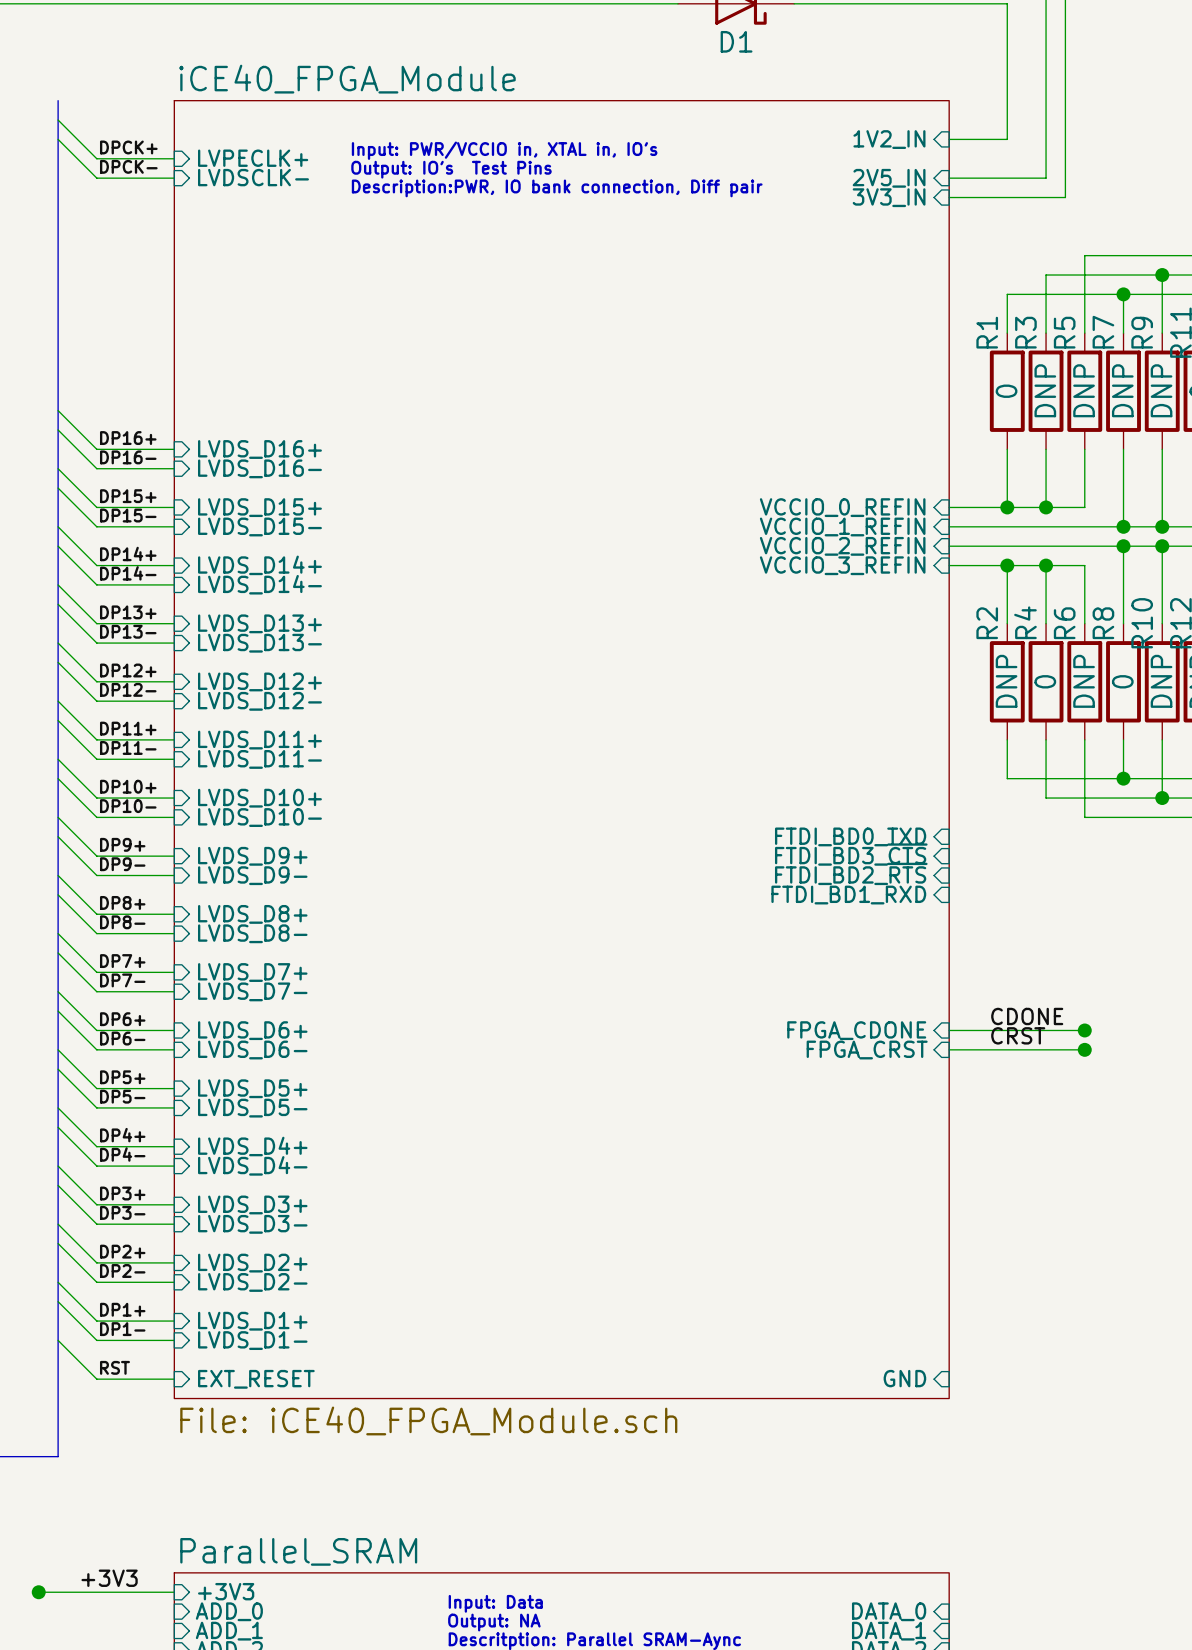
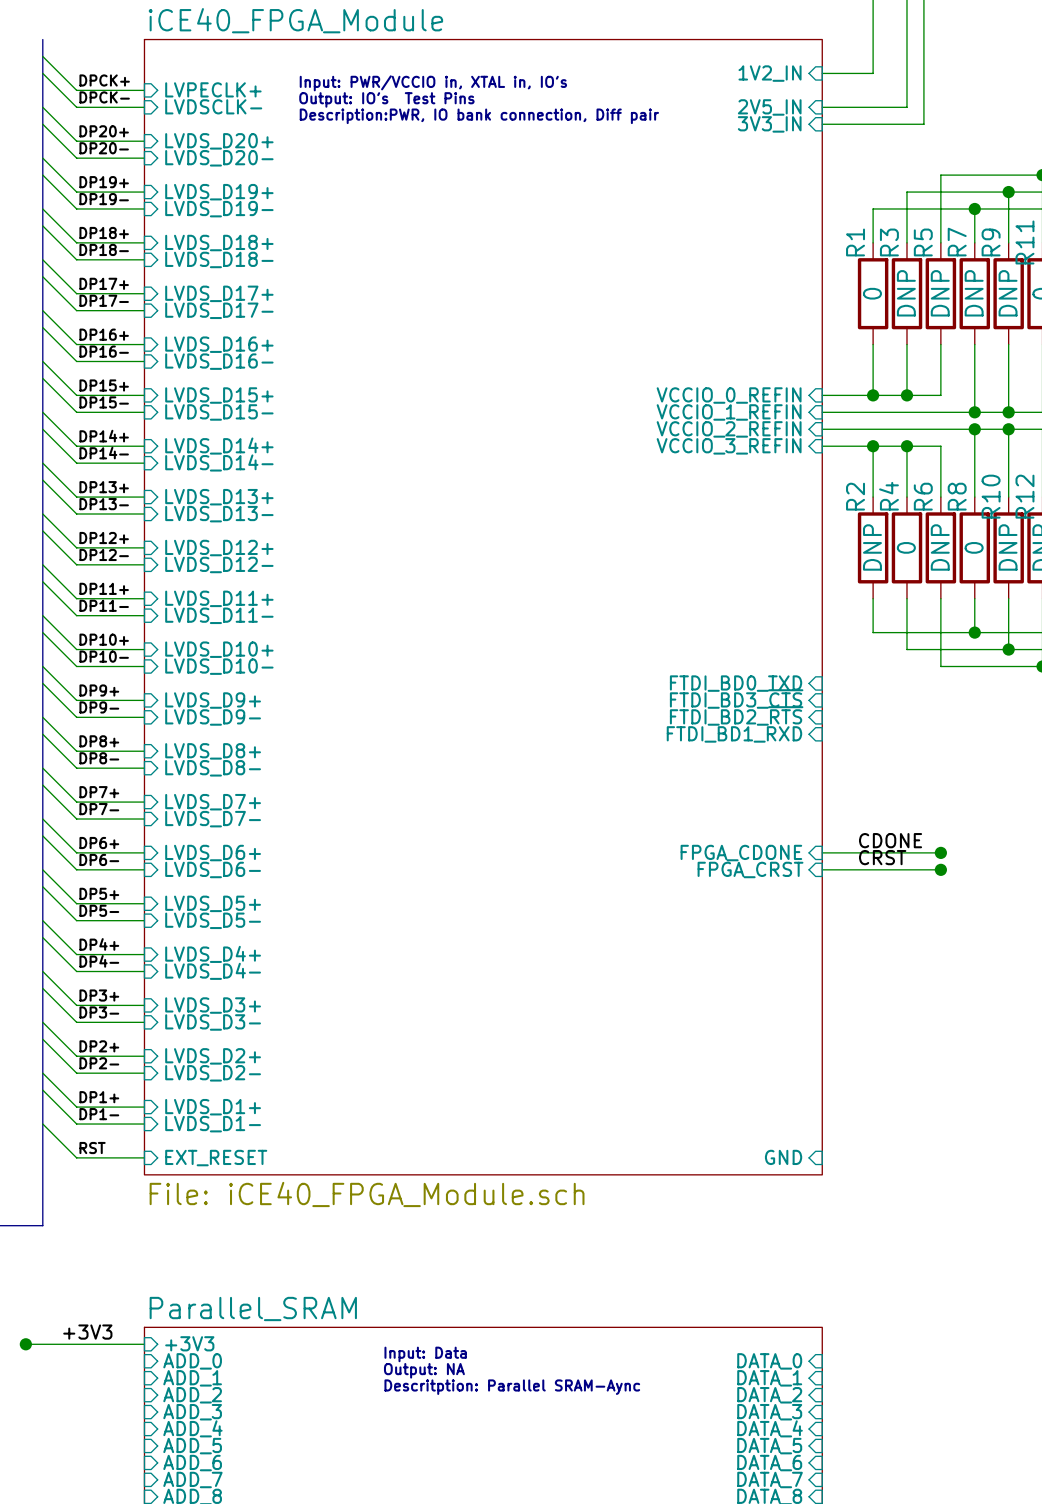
wire: none -> (42, 107) (76, 141) (144, 141)
wire: none -> (42, 124) (76, 158) (144, 158)
label: none -> DP20+ (104, 131)
sheet pin: none -> LVDS_D20+ (219, 141)
label: none -> DP20- (104, 148)
wire: none -> (42, 158) (76, 192) (144, 192)
sheet pin: none -> LVDS_D20- (219, 158)
wire: none -> (42, 175) (76, 208) (144, 208)
label: none -> DP19+ (104, 182)
sheet pin: none -> LVDS_D19+ (219, 192)
label: none -> DP19- (104, 199)
wire: none -> (42, 208) (76, 242) (144, 242)
sheet pin: none -> LVDS_D19- (219, 209)
wire: none -> (42, 225) (76, 259) (144, 259)
label: none -> DP18+ (104, 232)
sheet pin: none -> LVDS_D18+ (219, 243)
label: none -> DP18- (104, 249)
wire: none -> (42, 259) (76, 293) (144, 293)
sheet pin: none -> LVDS_D18- (219, 259)
wire: none -> (42, 276) (76, 310) (144, 310)
label: none -> DP17+ (104, 283)
sheet pin: none -> LVDS_D17+ (219, 293)
label: none -> DP17- (104, 300)
sheet pin: none -> LVDS_D17- (219, 310)

